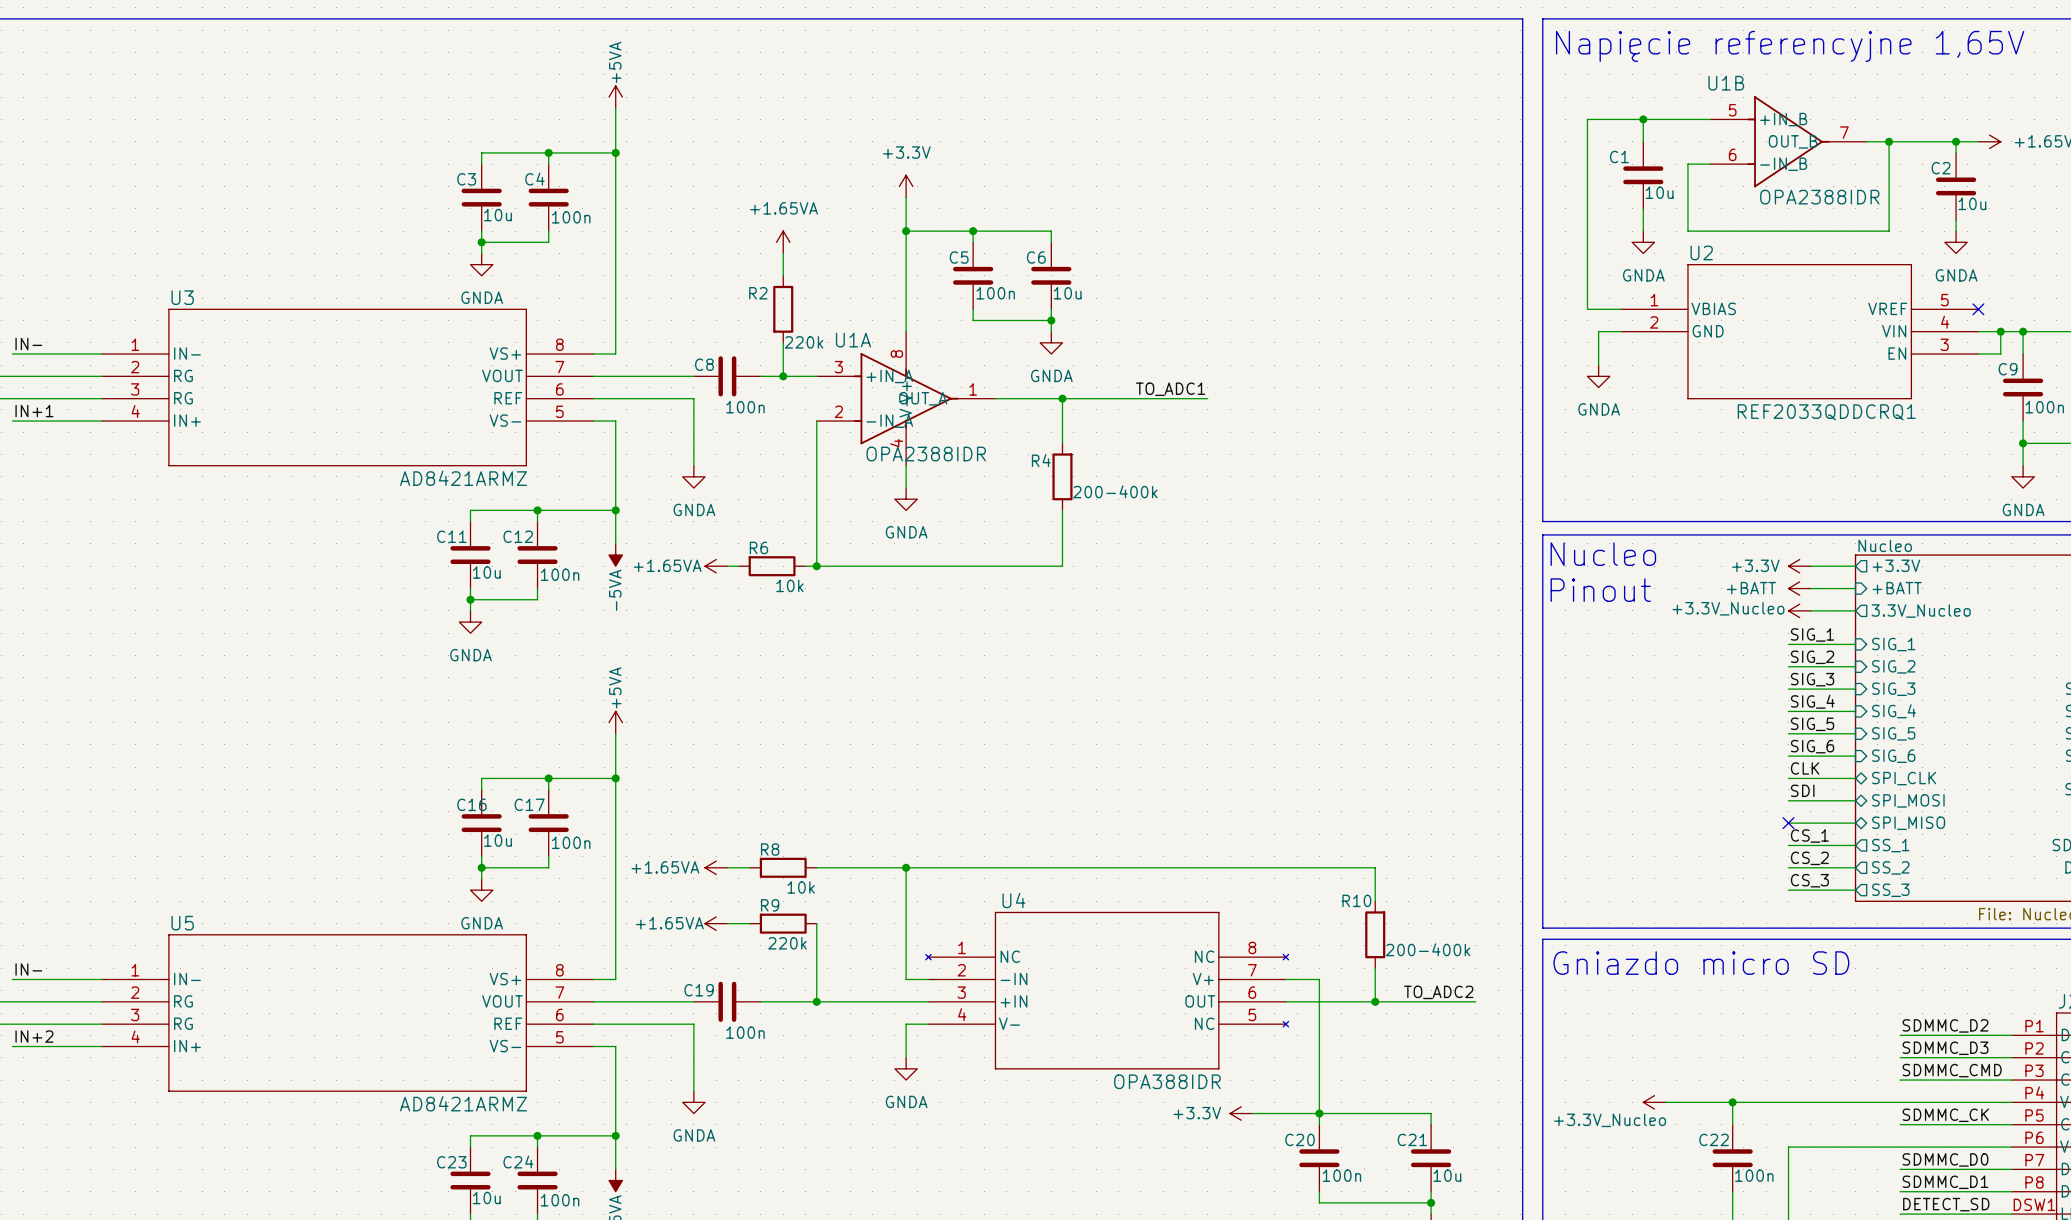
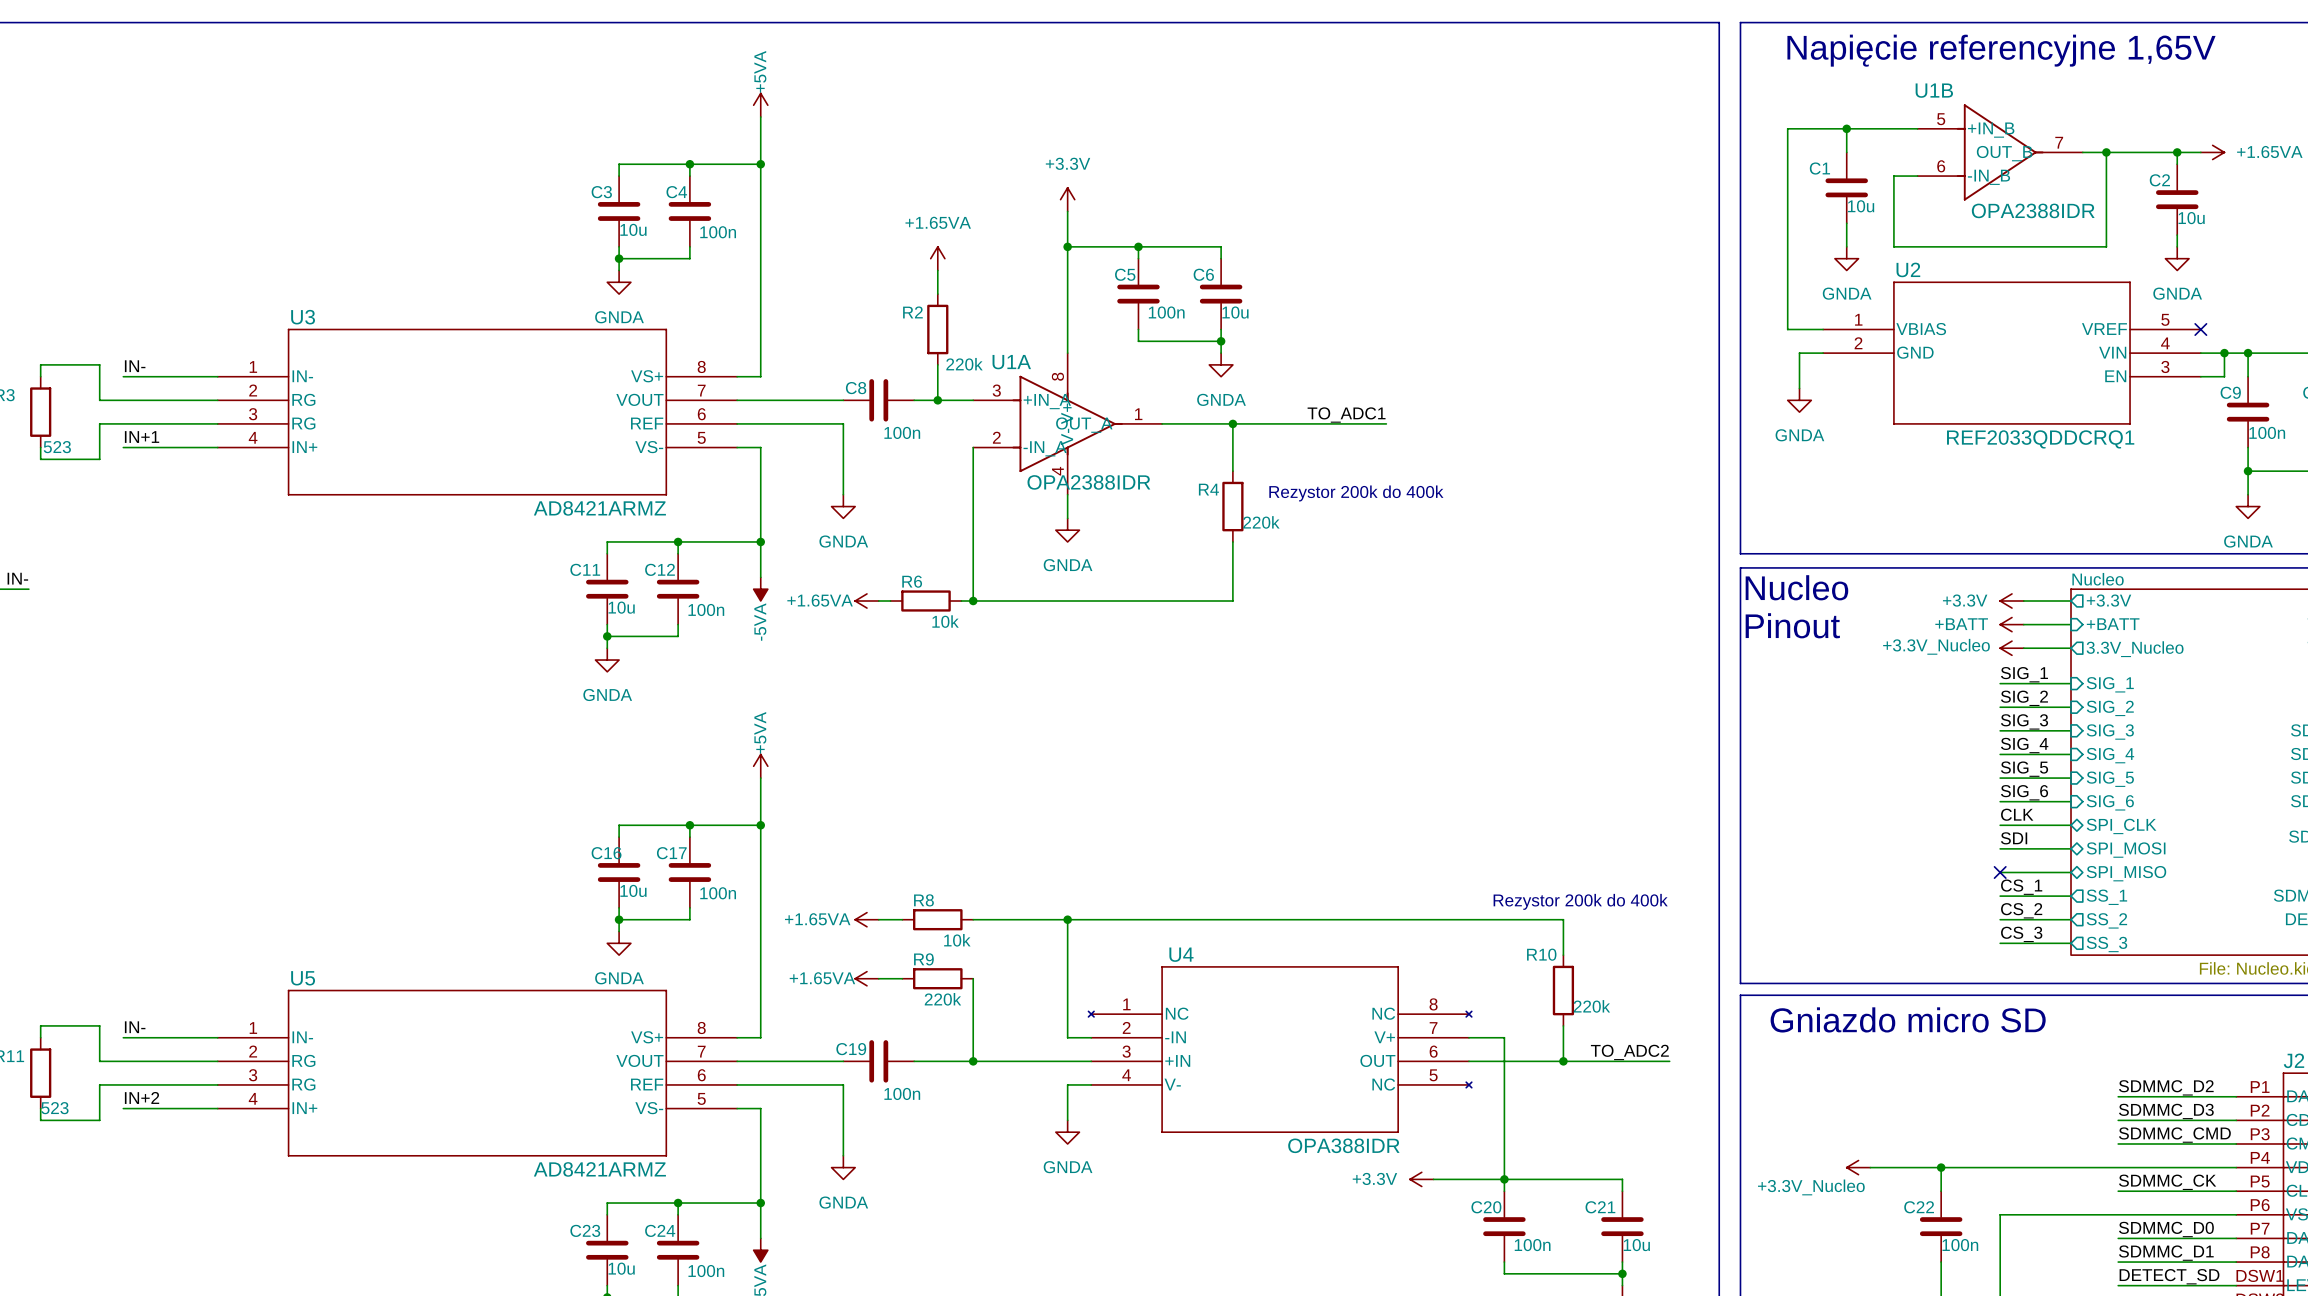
text: none -> Rezystor 200k do 400k (1356, 493)
R4 value: 200-400k (1115, 491) -> 220k (1261, 522)
text: none -> Rezystor 200k do 400k (1580, 901)
R10 value: 200-400k (1428, 949) -> 220k (1591, 1006)

